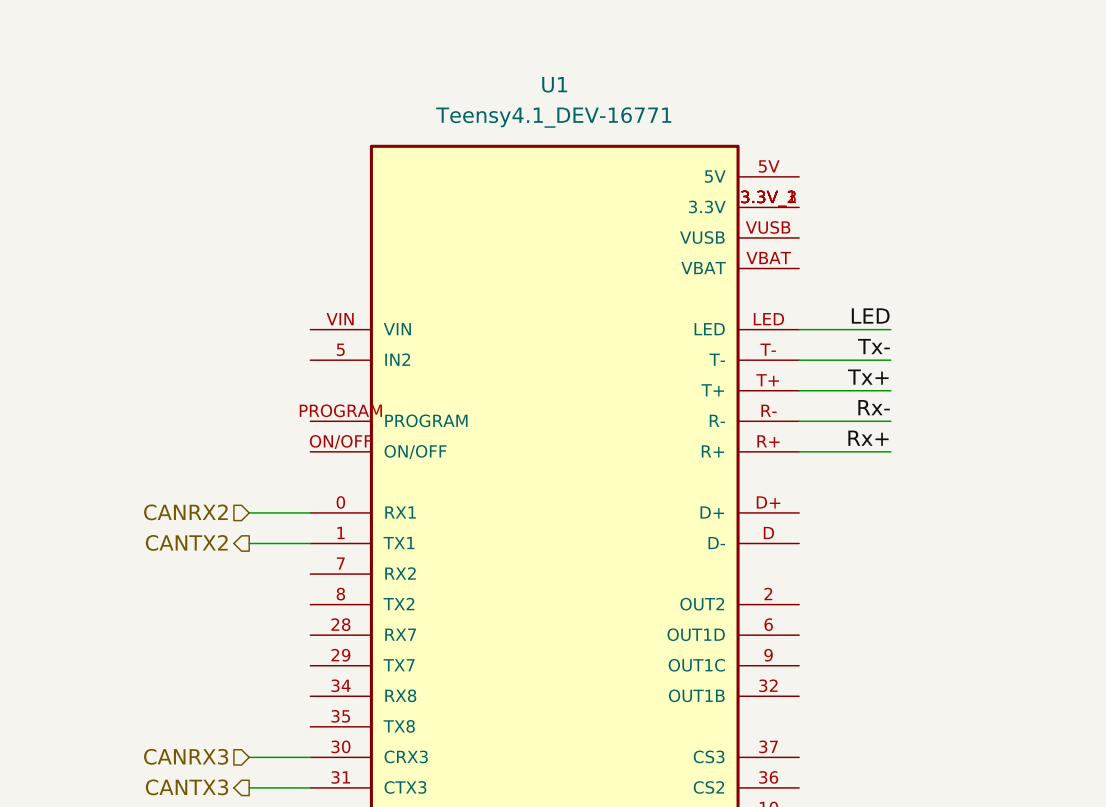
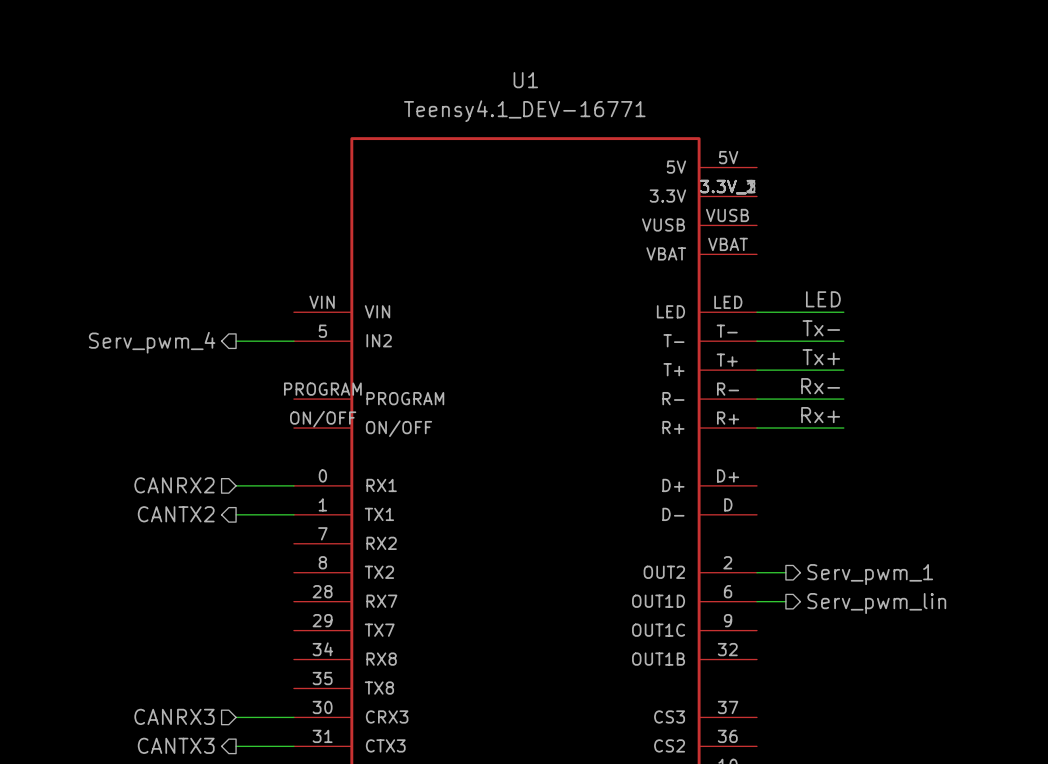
wire: none -> (236, 341) (293, 341)
hierarchical label: none -> Serv_pwm_4 (152, 342)
wire: none -> (756, 572) (785, 572)
hierarchical label: none -> Serv_pwm_1 (870, 574)
wire: none -> (756, 601) (785, 601)
hierarchical label: none -> Serv_pwm_lin (876, 603)

